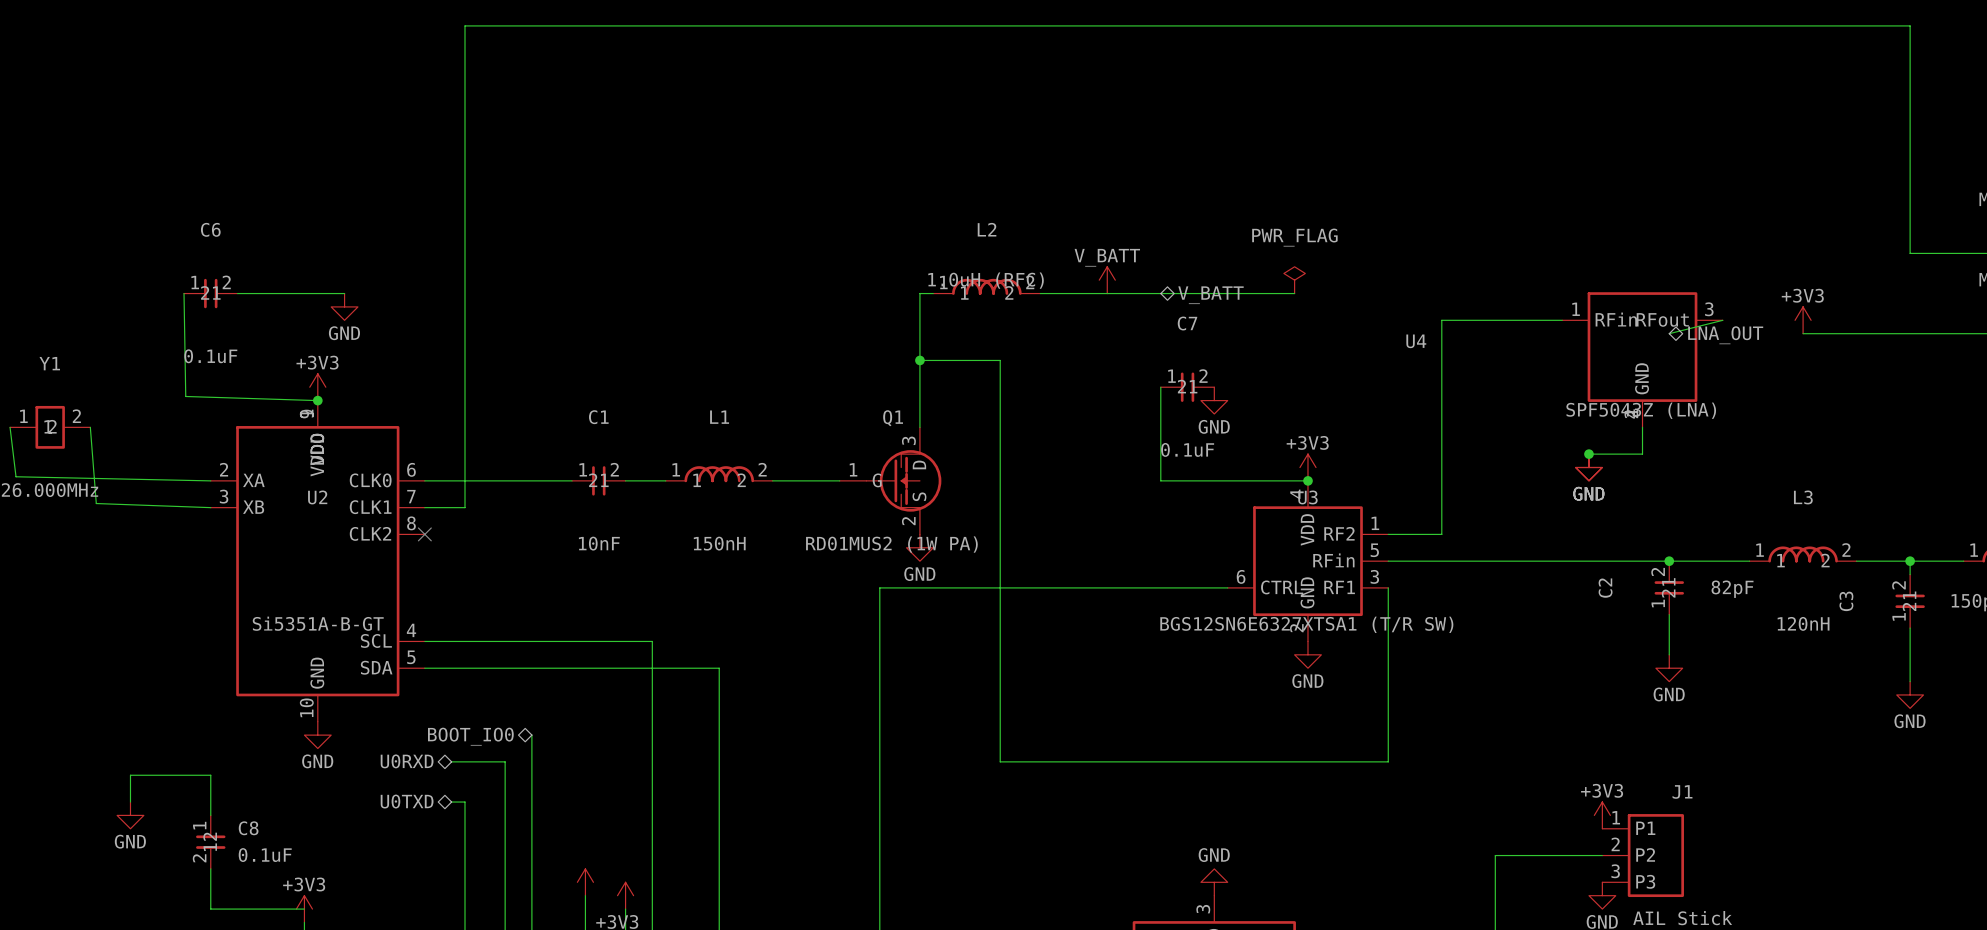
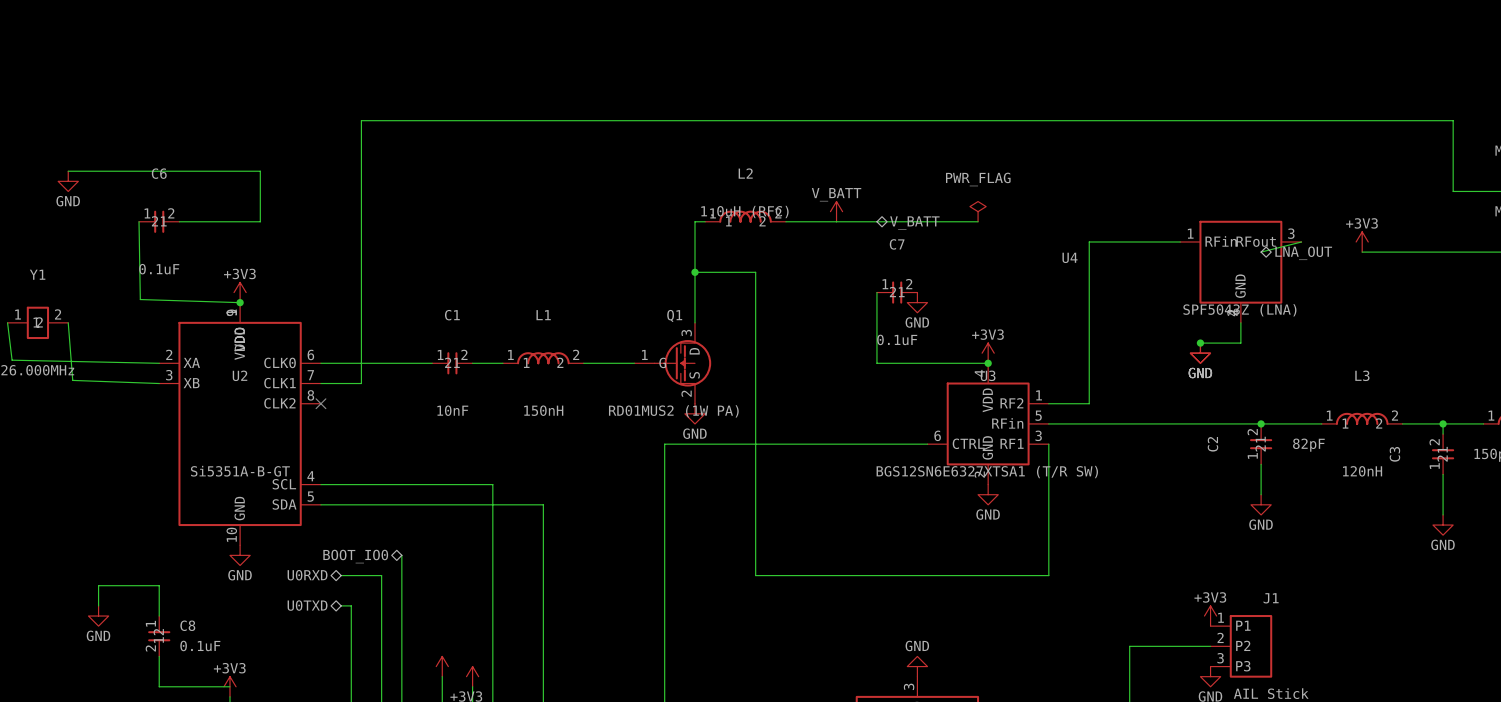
wire: none -> (68, 171) (260, 171) (260, 221)
wire: (1923, 253) (1910, 253) (1910, 25) (465, 25) (465, 507) -> (1453, 191) (1453, 120) (361, 120) (361, 383) (351, 383)
power symbol position: GND (344, 306) -> GND (68, 181)

